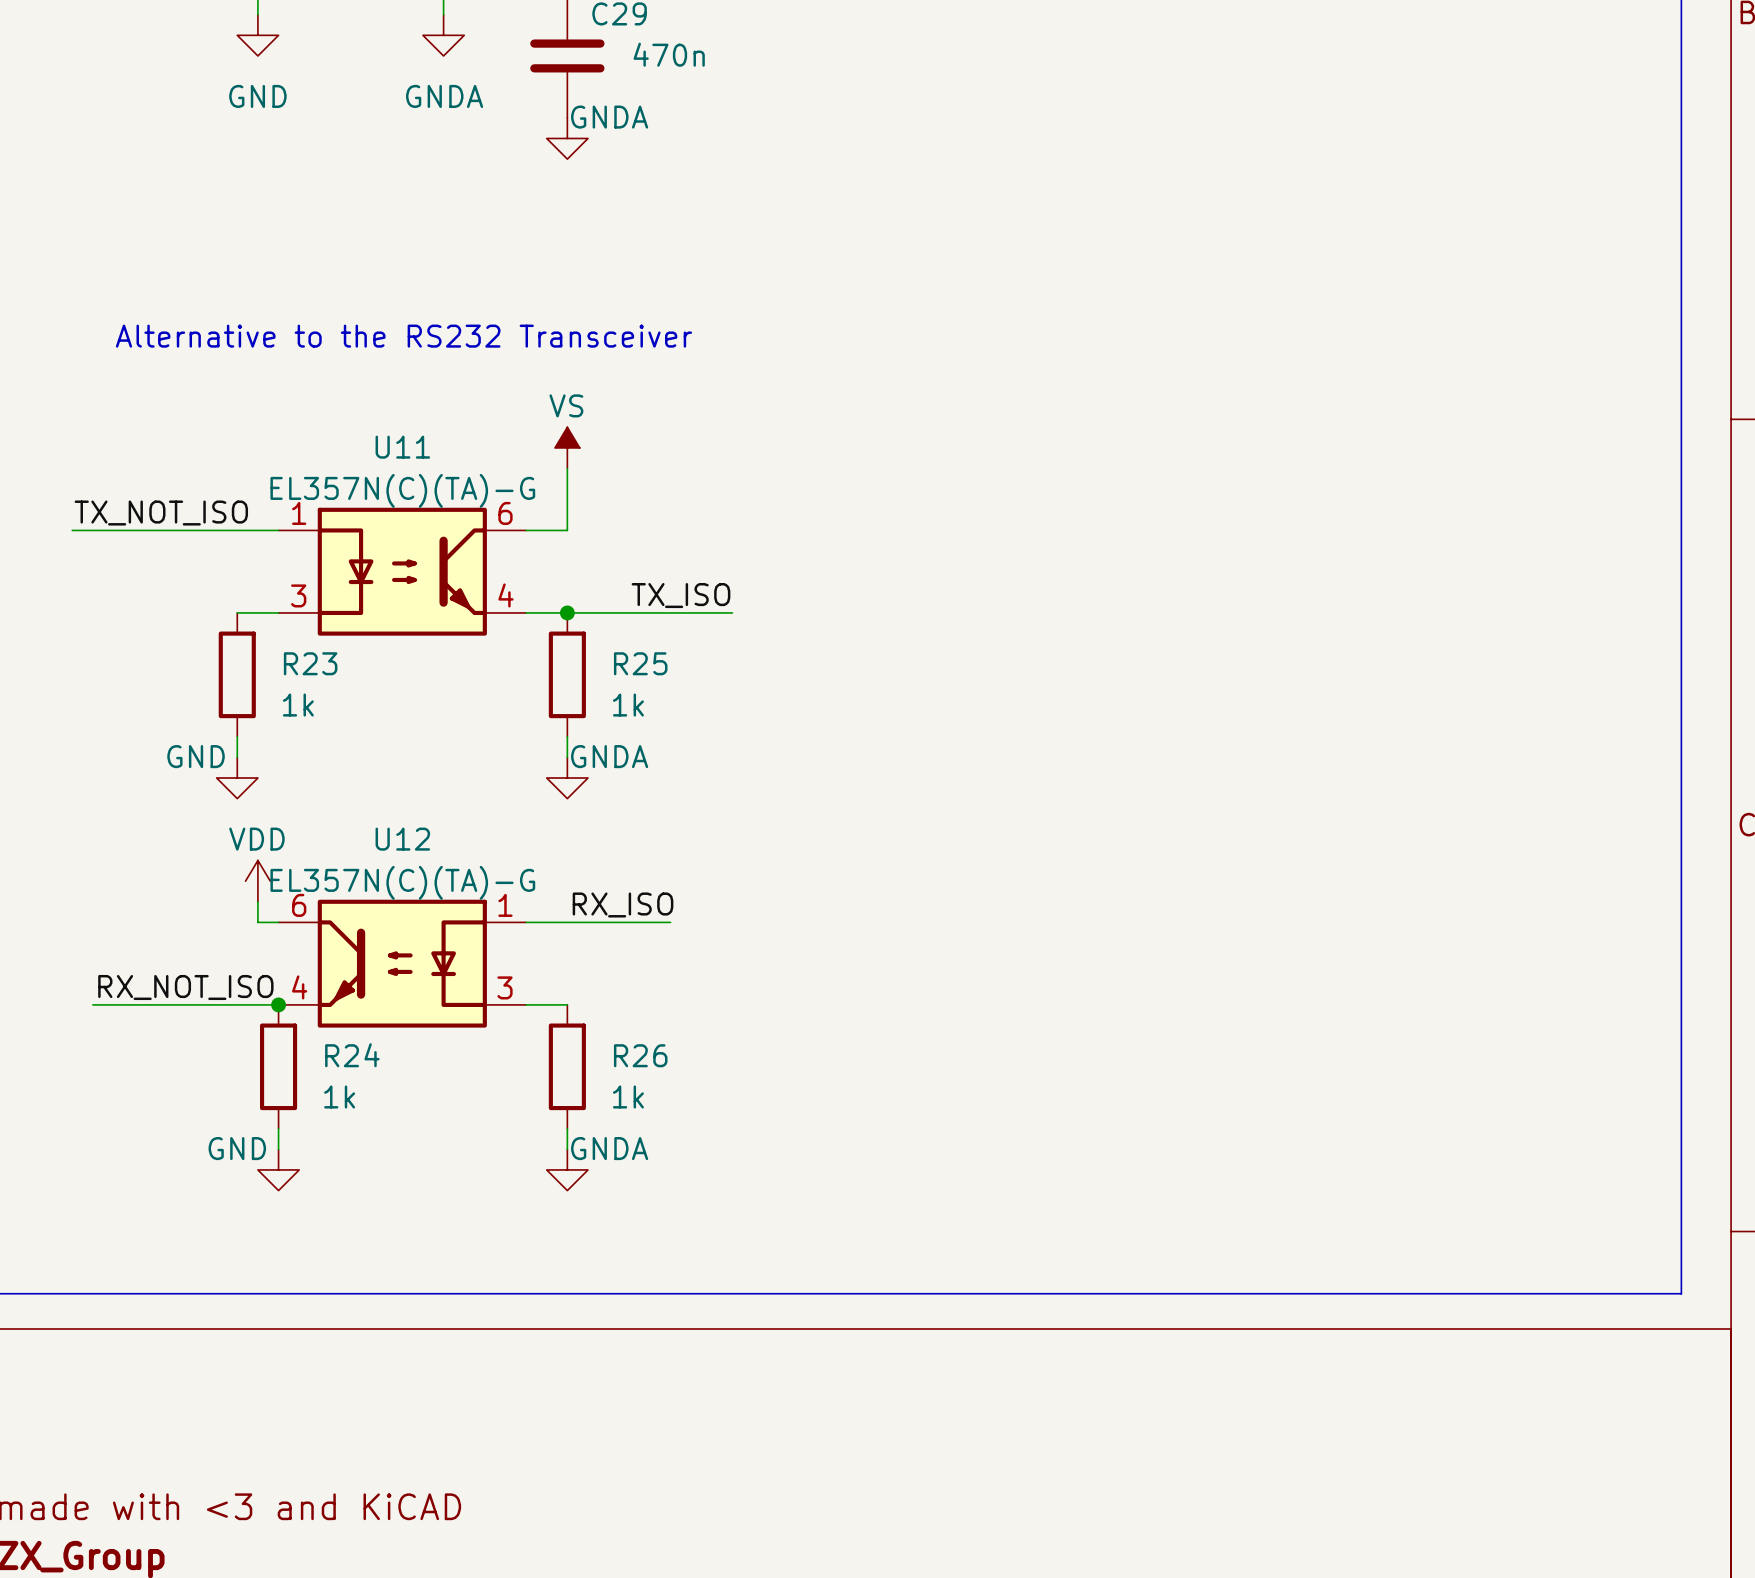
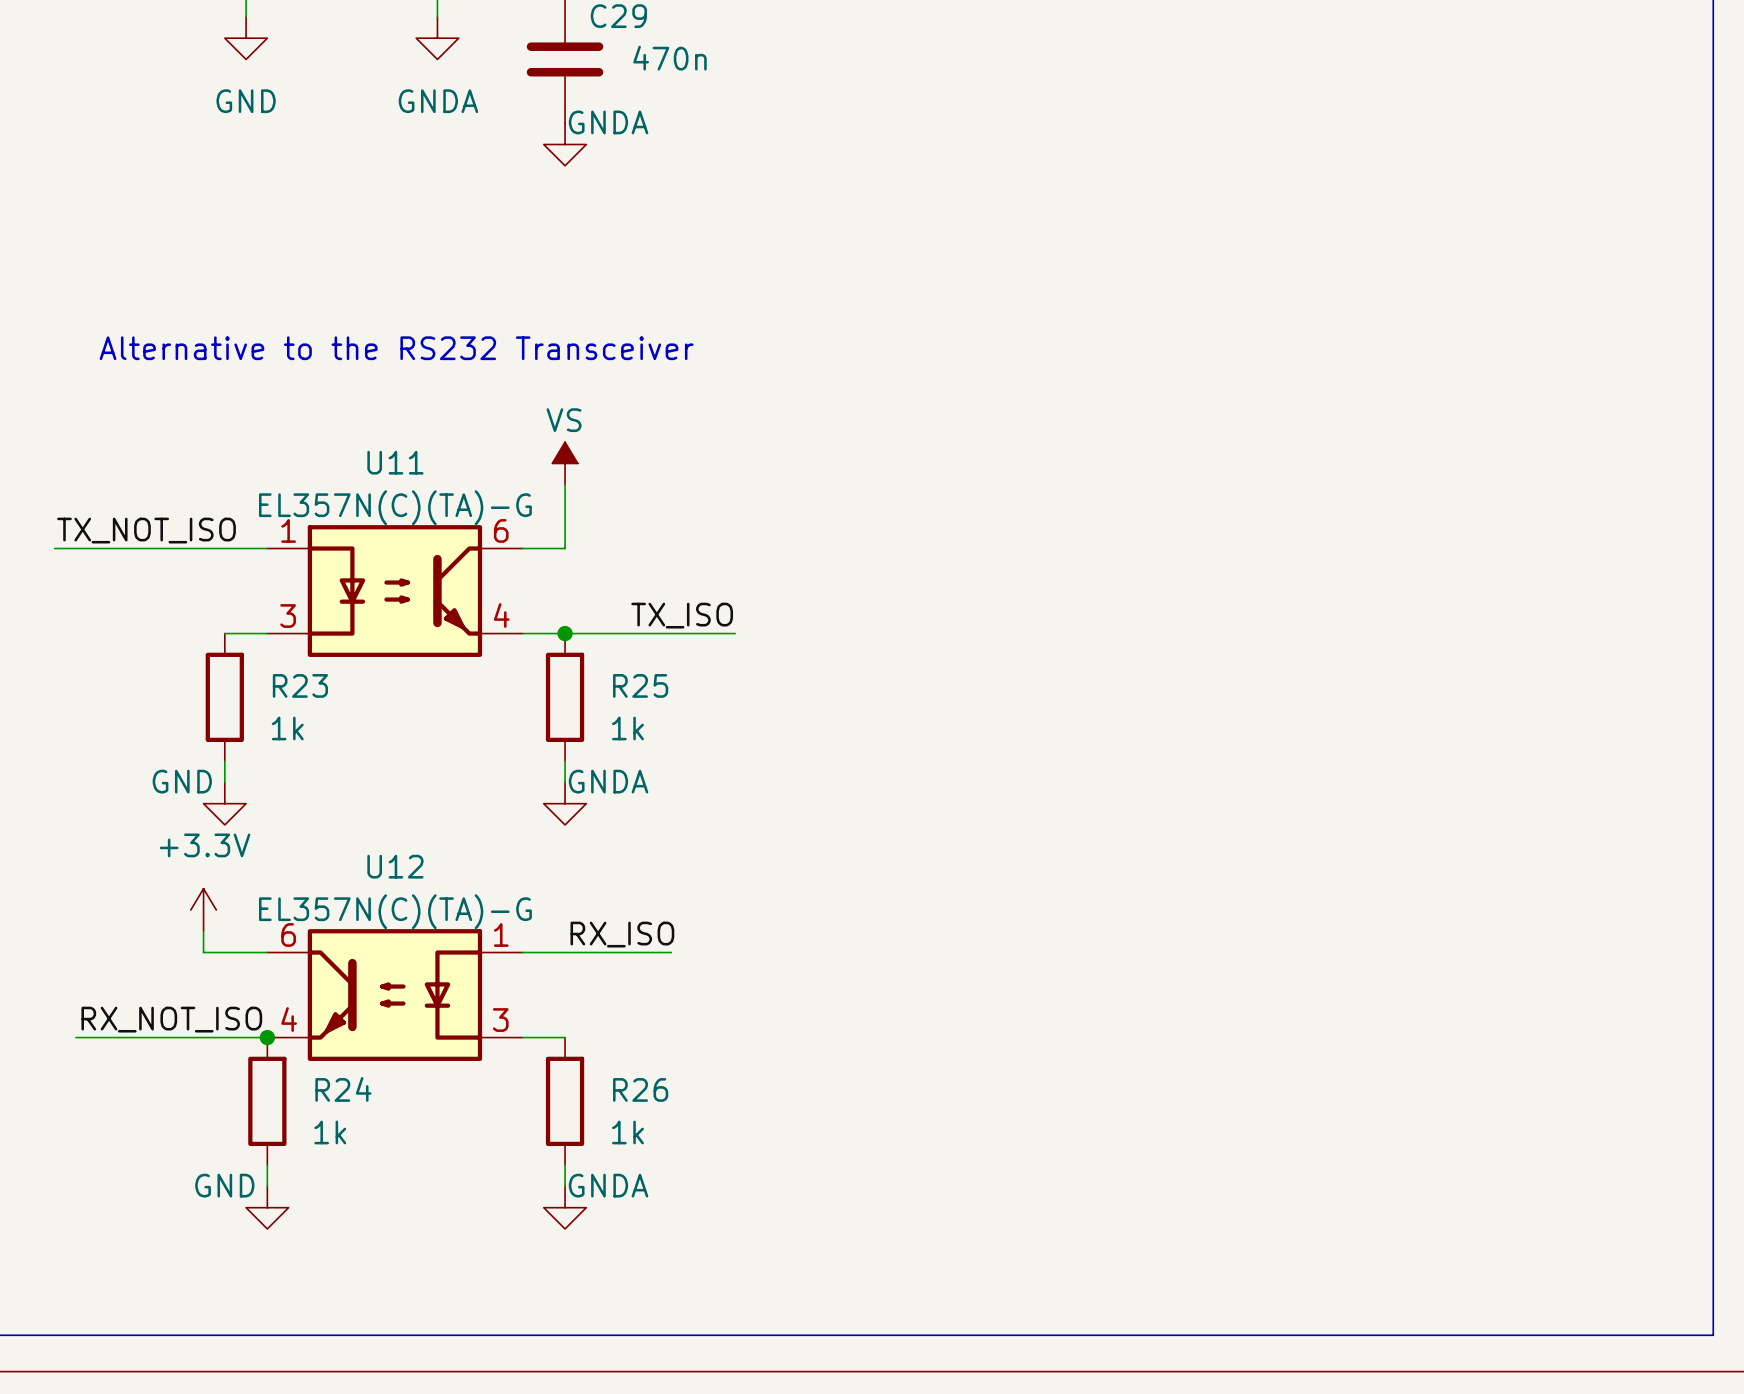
power symbol: none -> +3.3V (203, 909)
power symbol: VDD (257, 881) -> none
wire: (257, 901) (257, 922) -> (203, 931) (203, 952) (246, 952)

